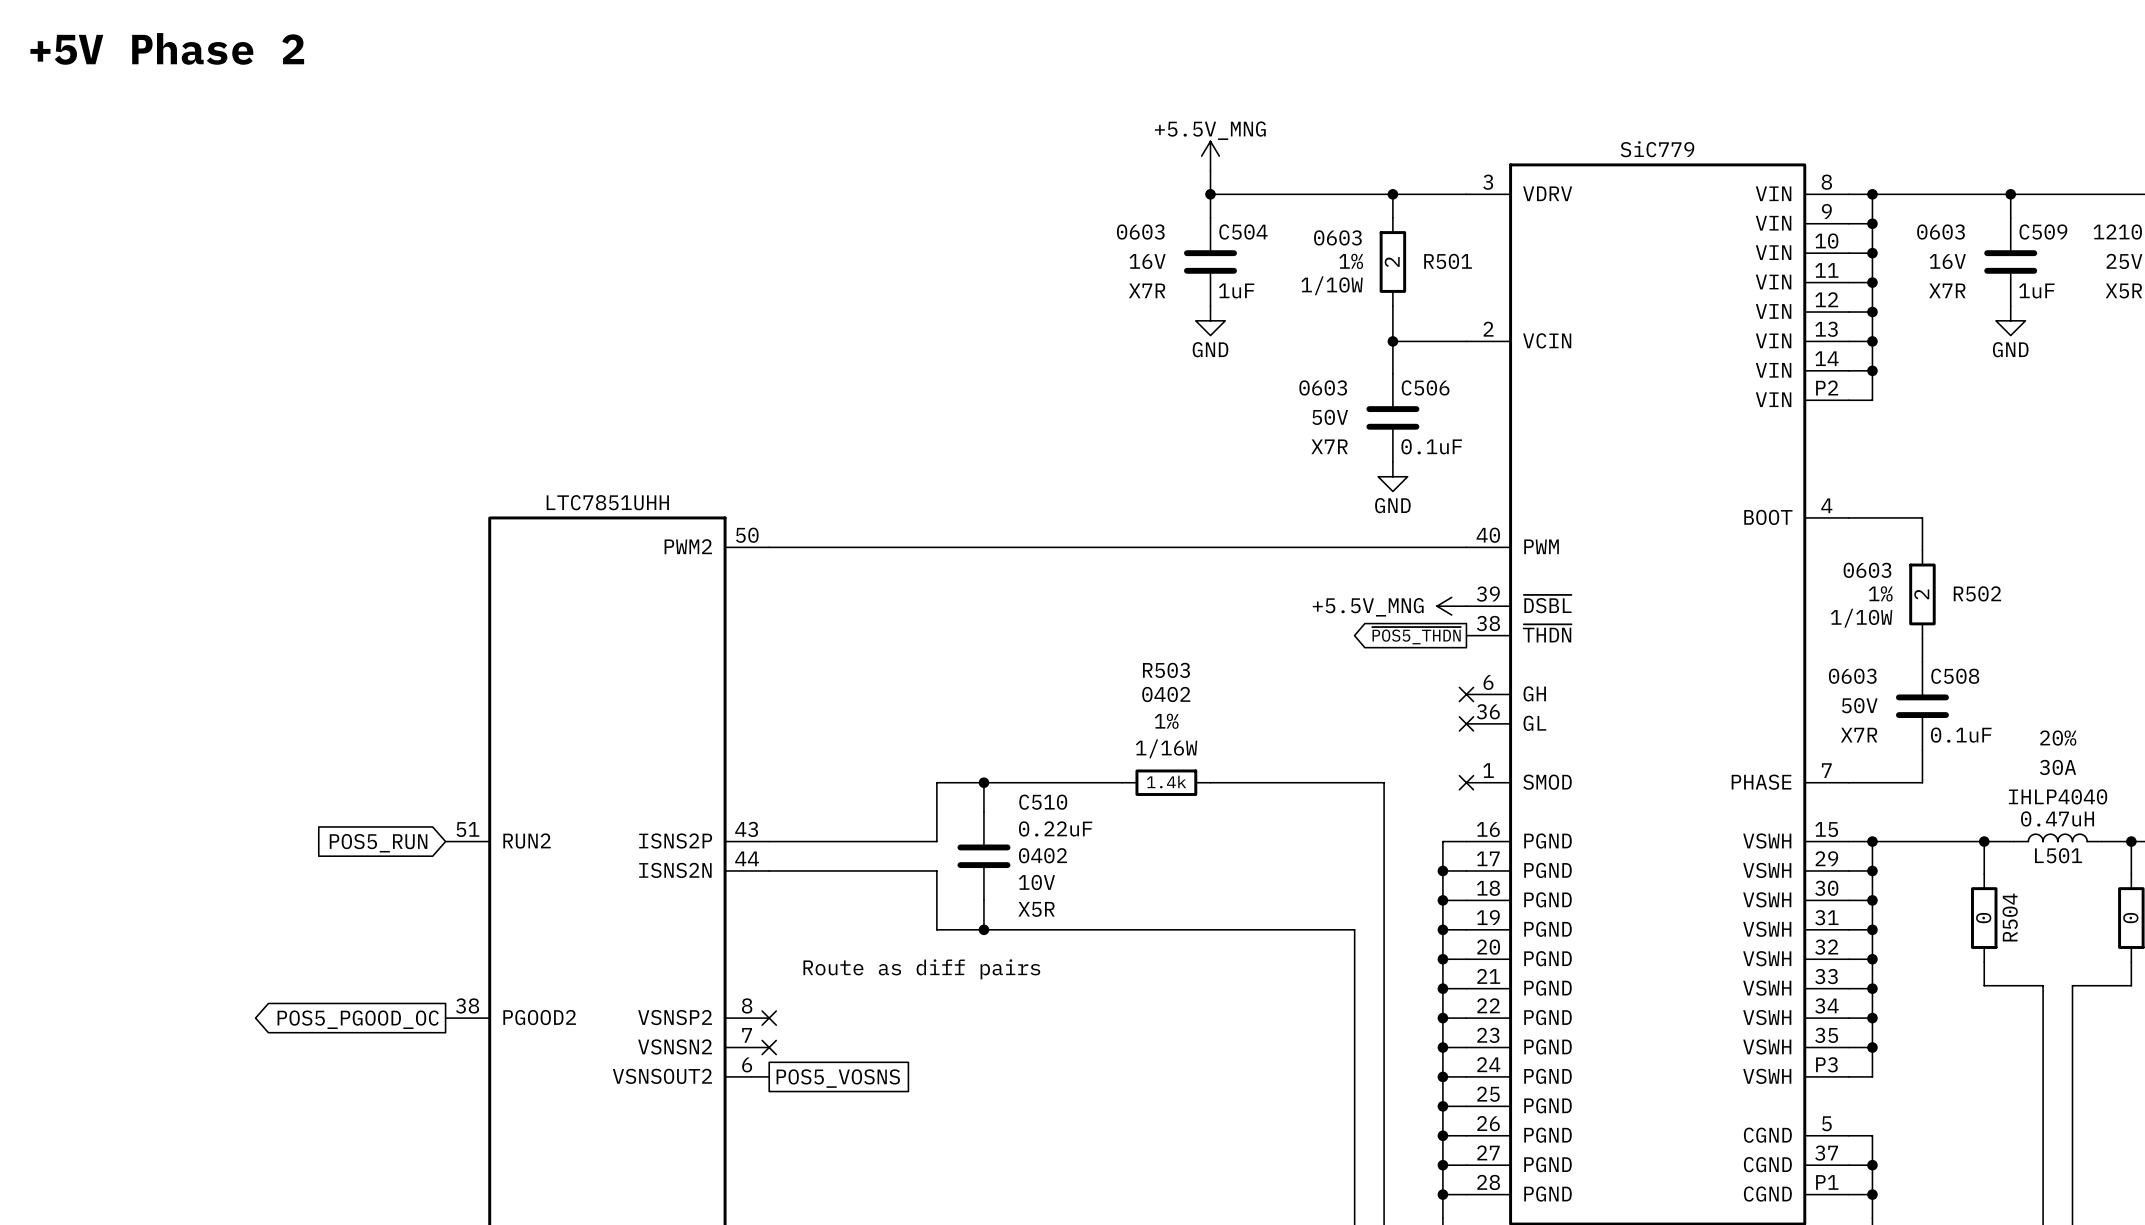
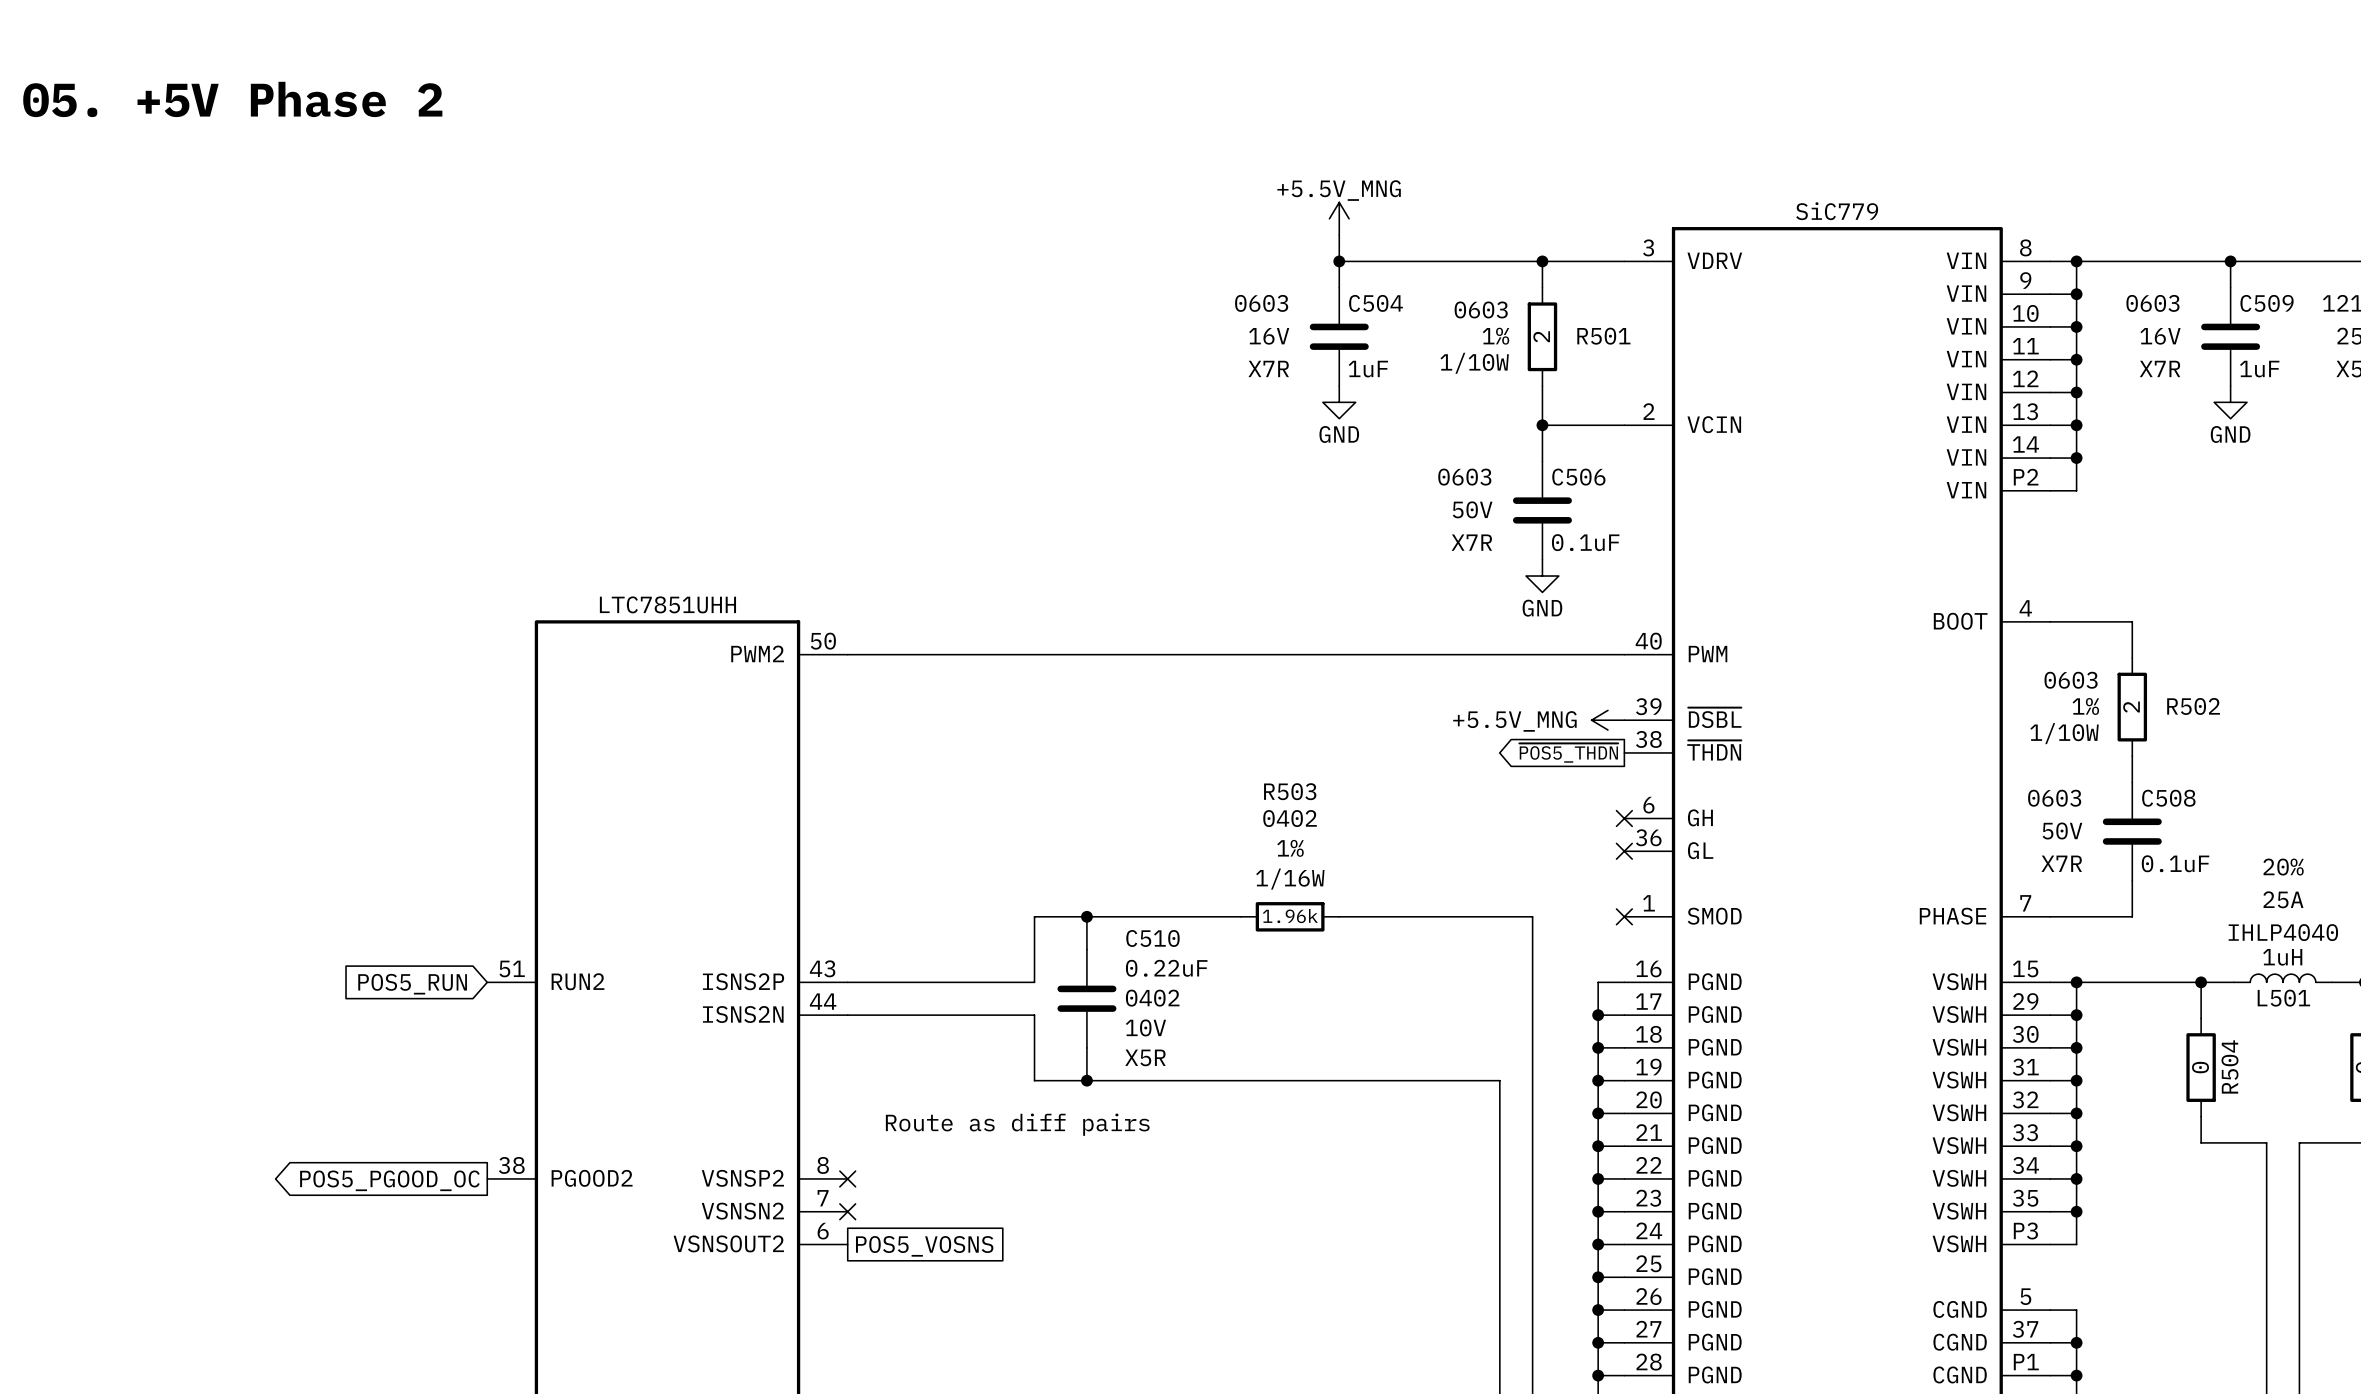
text: +5V Phase 2 (167, 48) -> 05. +5V Phase 2 (232, 99)
L501 text: 30A (2057, 767) -> 25A (2283, 899)
R503 value: 1.4k (1166, 782) -> 1.96k (1290, 916)
L501 value: 0.47uH (2057, 818) -> 1uH (2282, 957)

